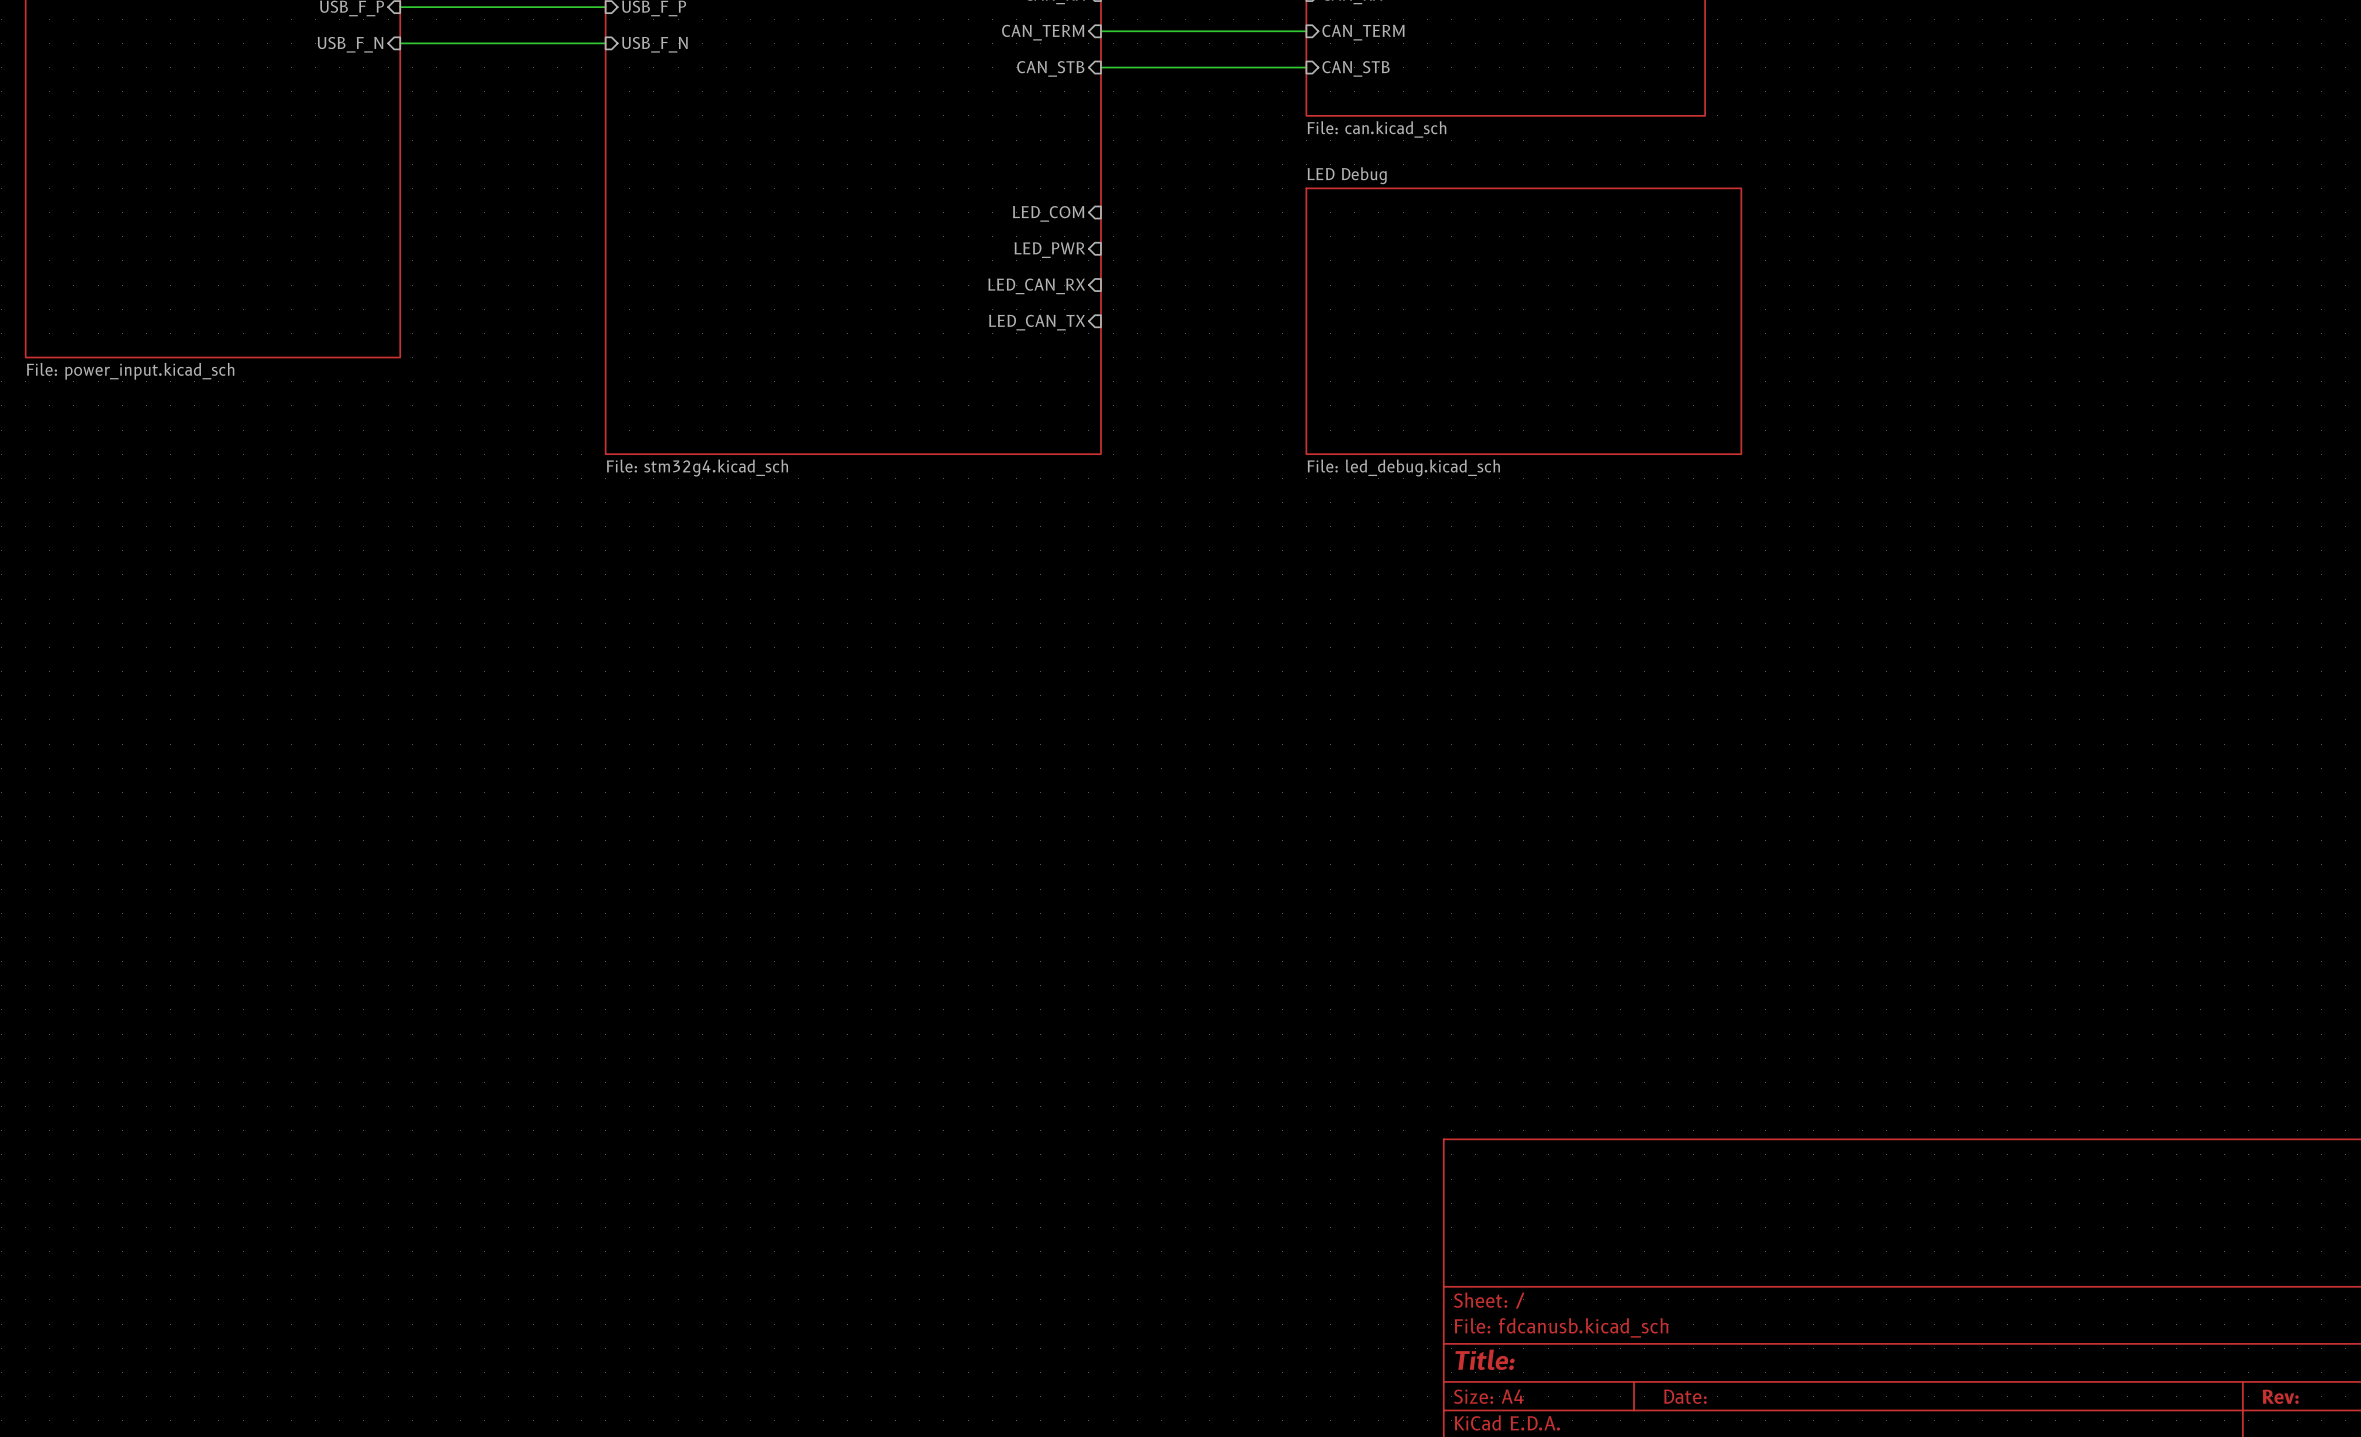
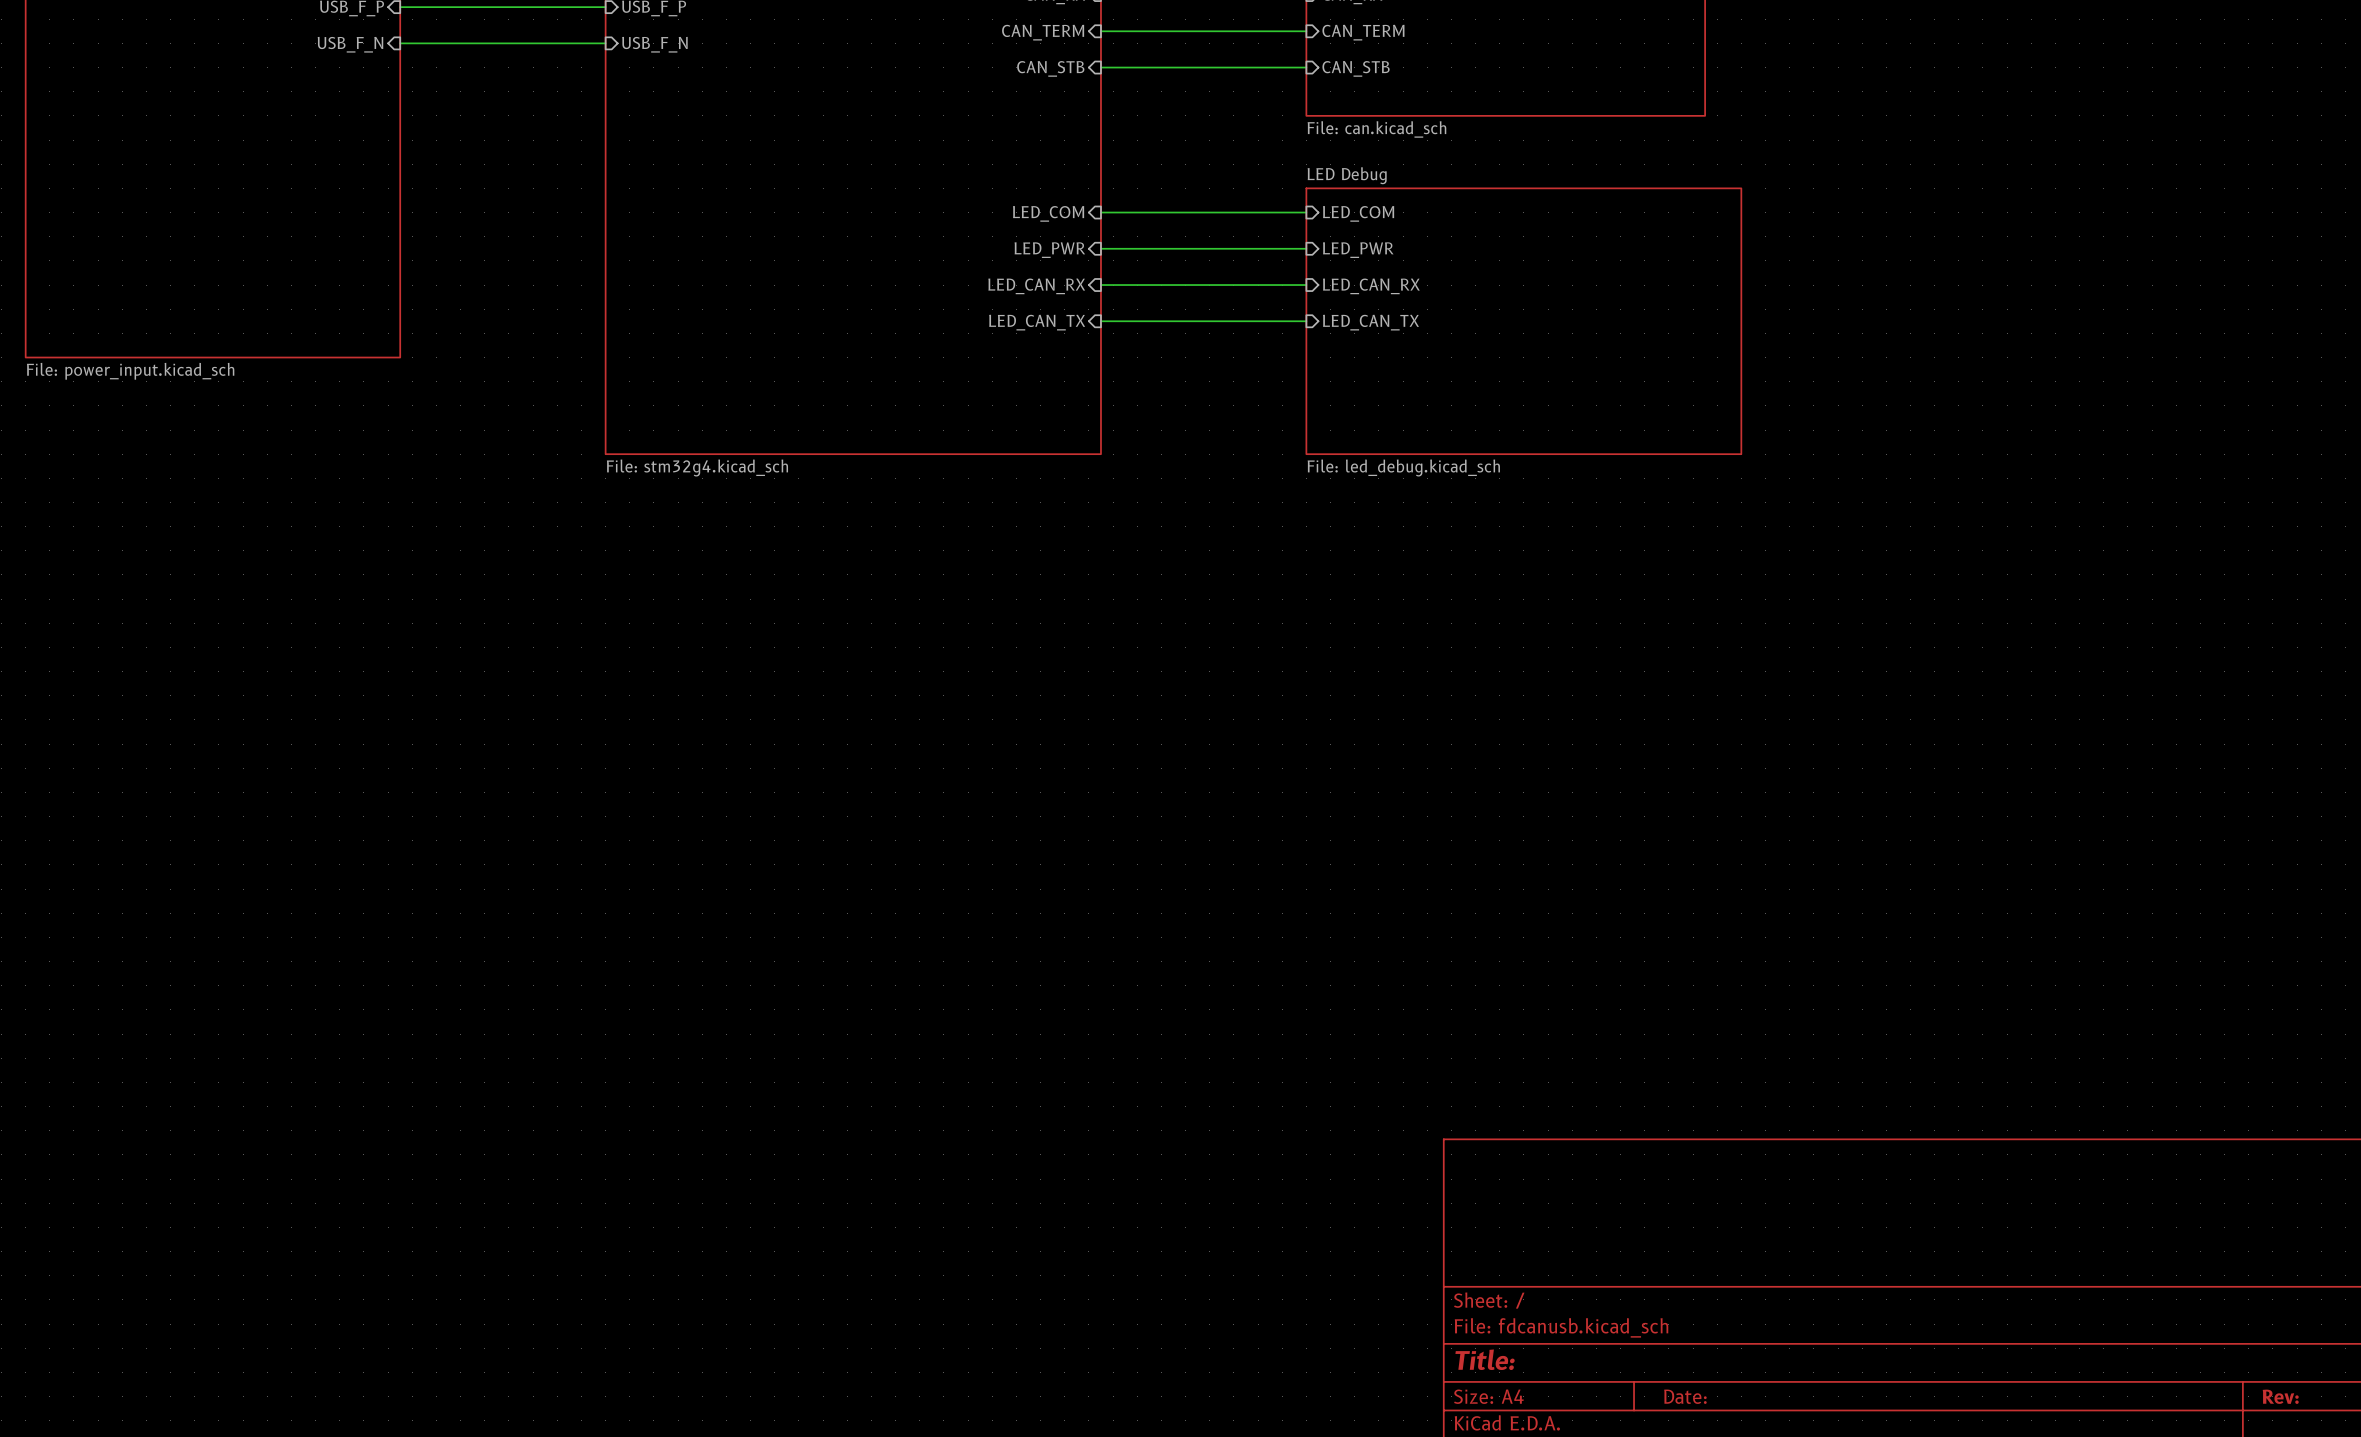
wire: none -> (1100, 212) (1306, 212)
sheet pin: none -> LED_COM (1358, 213)
wire: none -> (1100, 248) (1306, 248)
sheet pin: none -> LED_PWR (1358, 250)
wire: none -> (1100, 285) (1306, 285)
sheet pin: none -> LED_CAN_RX (1371, 286)
wire: none -> (1100, 321) (1306, 321)
sheet pin: none -> LED_CAN_TX (1370, 322)

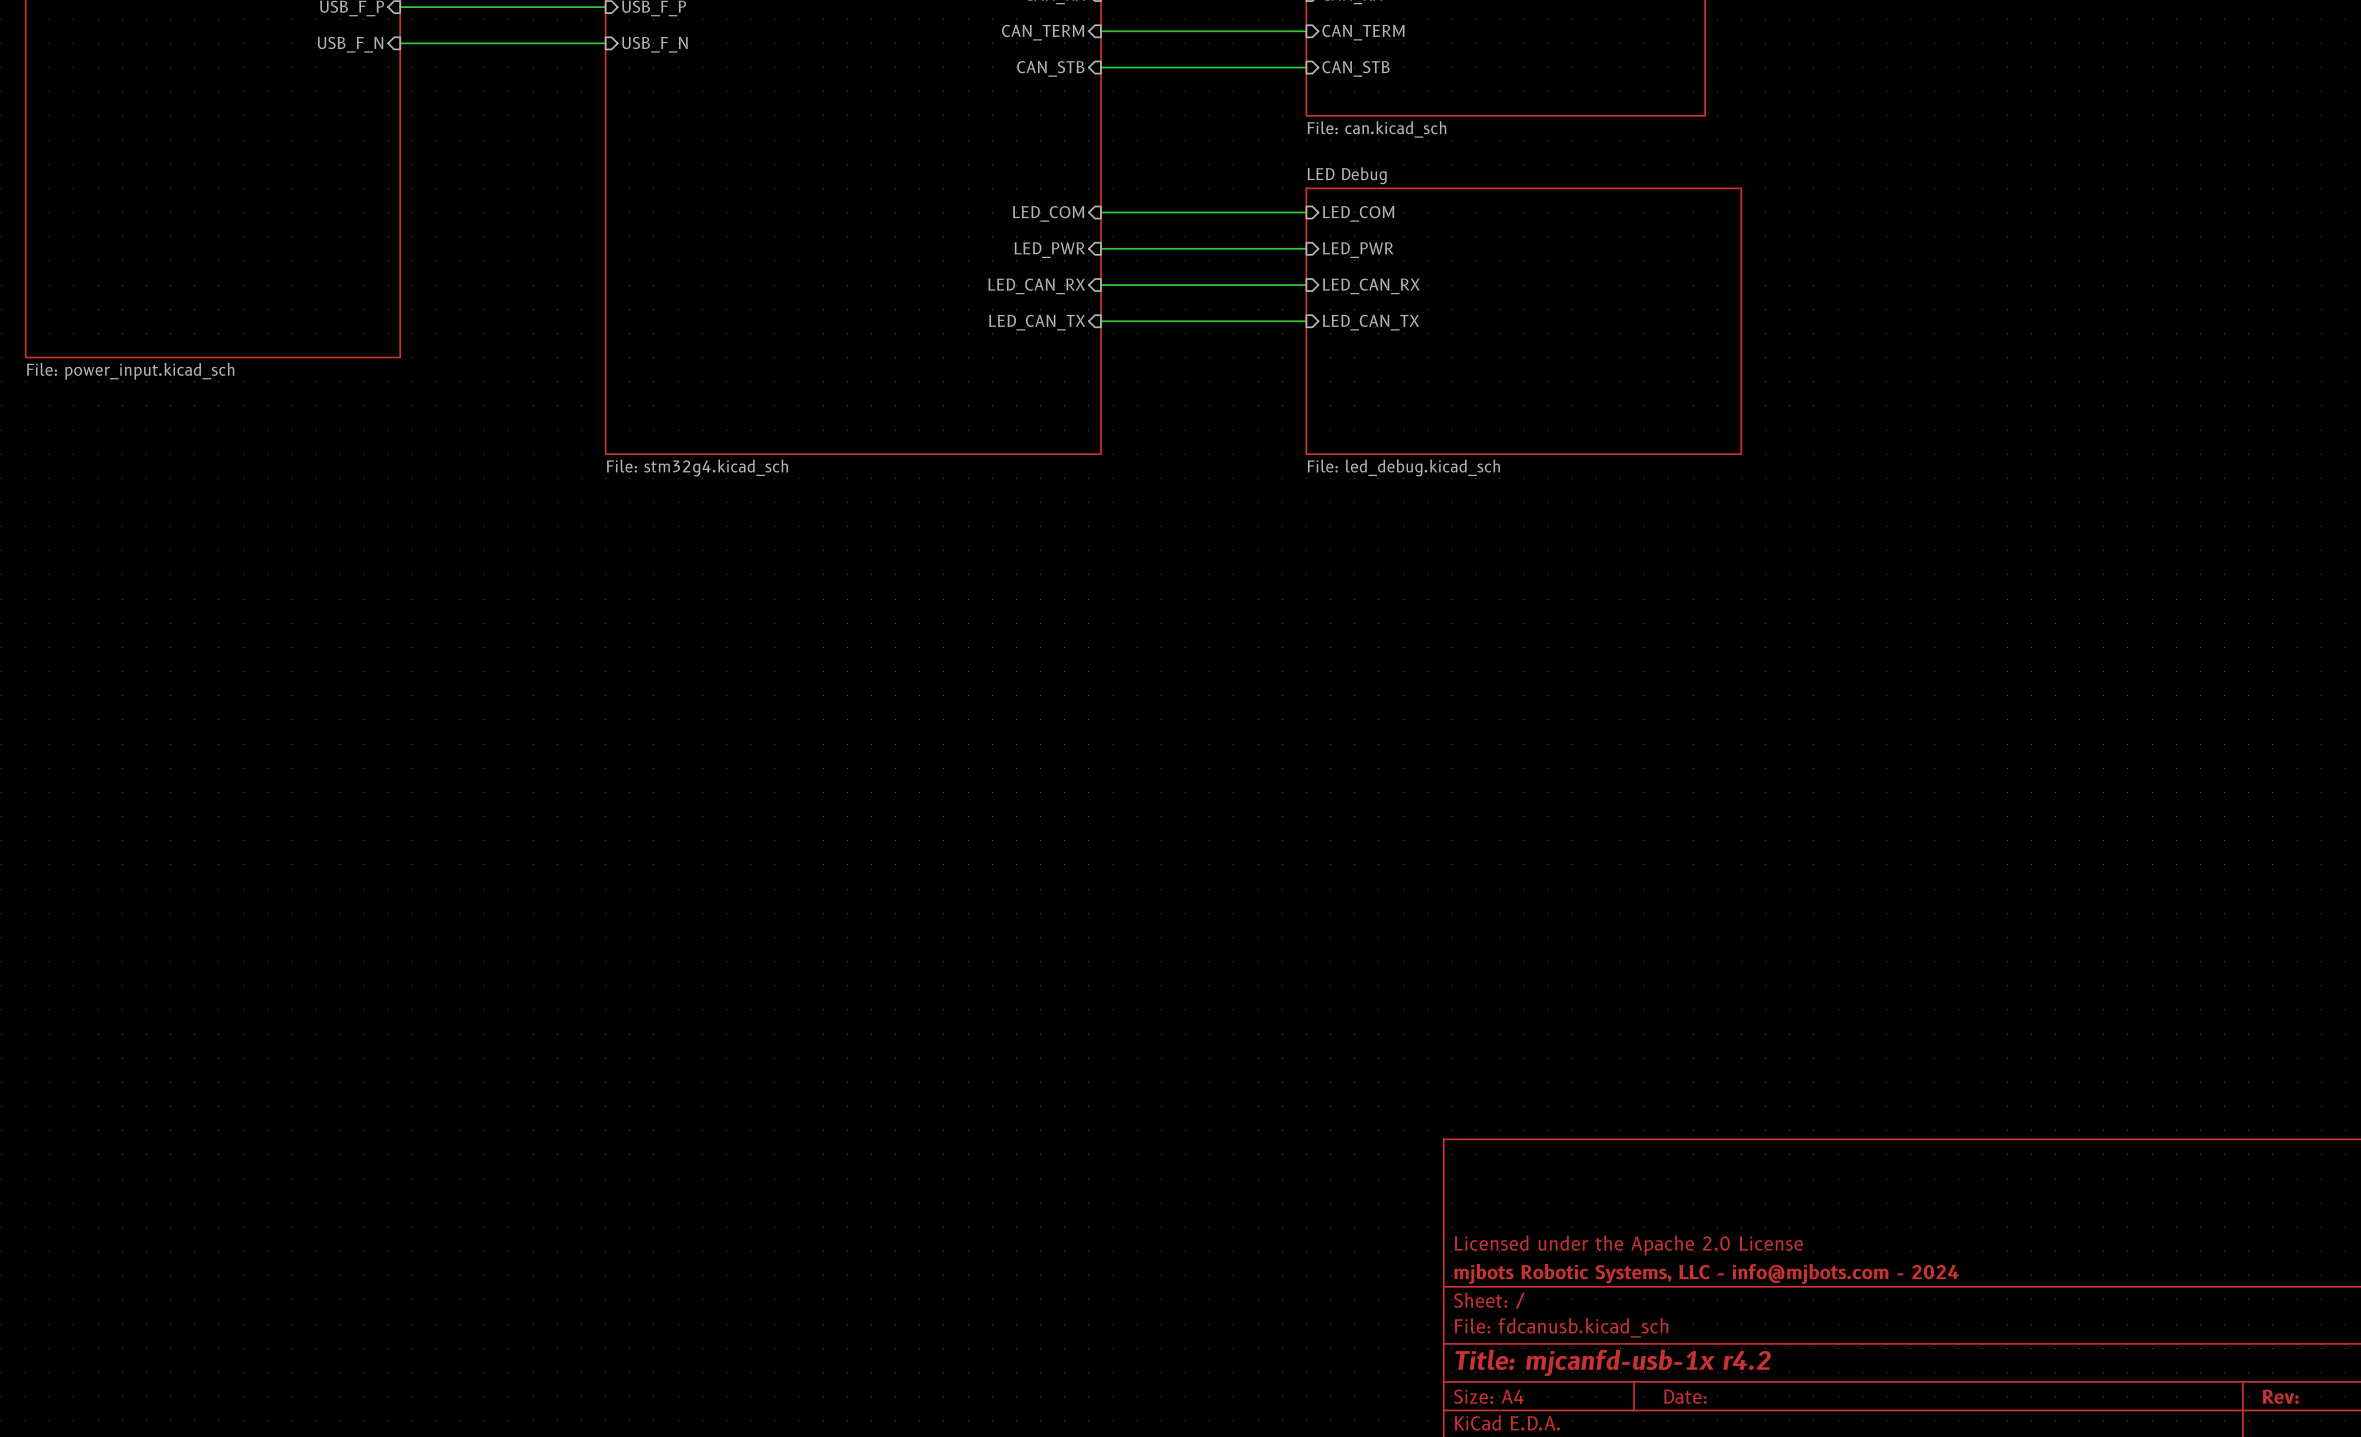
title block: none -> Licensed under the Apache 2.0 License (1628, 1245)
title block: none -> mjbots Robotic Systems, LLC - info@mjbots.com - 2024 (1706, 1273)
title block: Title: (1485, 1359) -> Title: mjcanfd-usb-1x r4.2 (1613, 1362)

